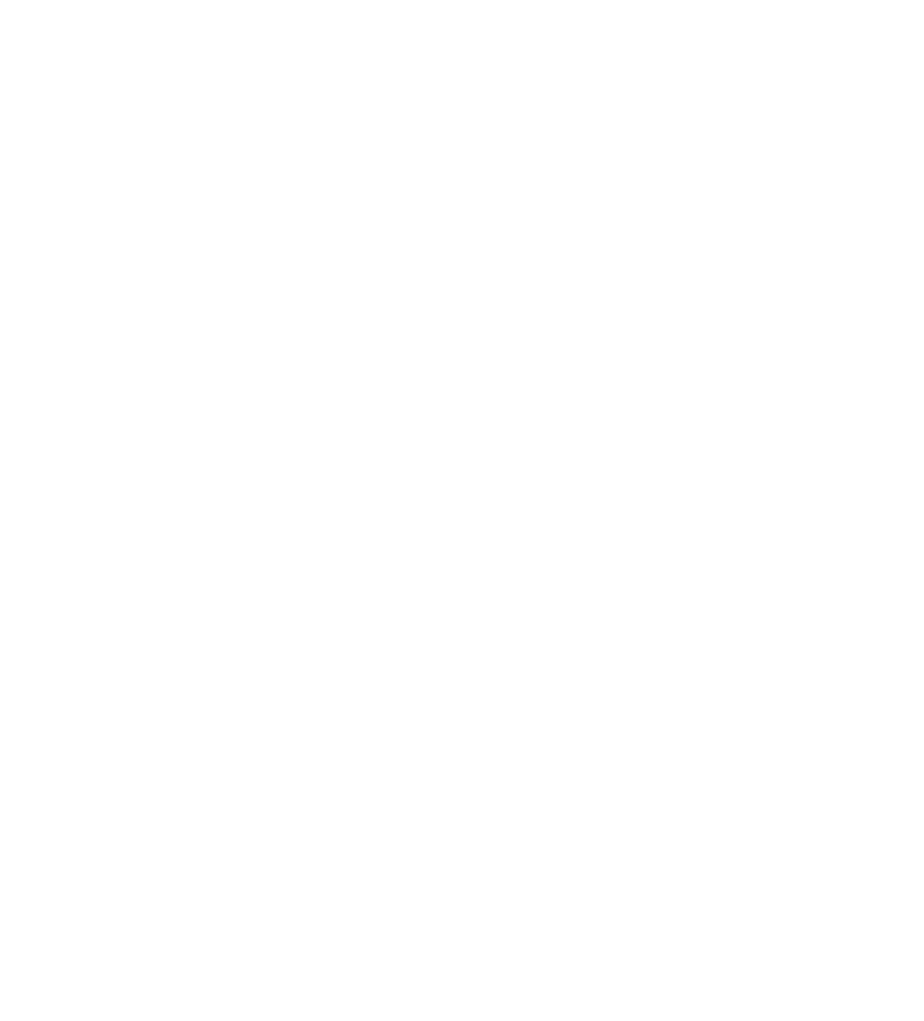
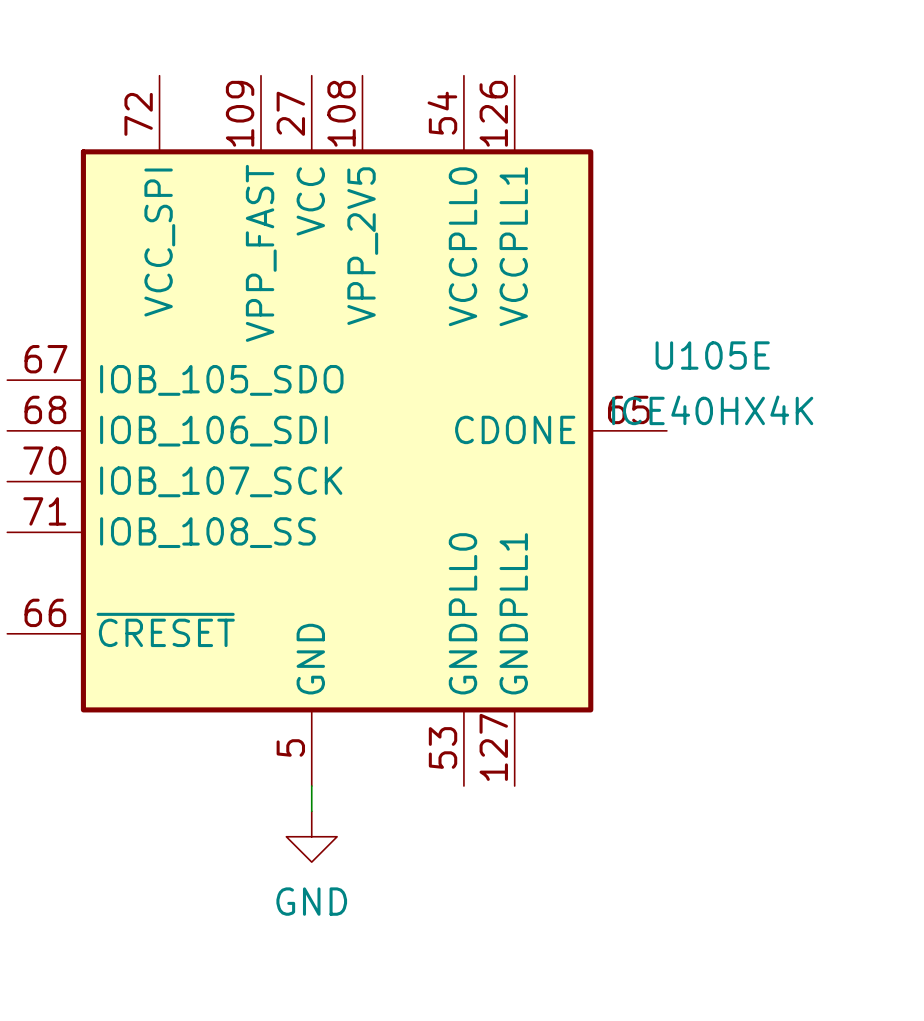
U105E: none -> ICE40HX4K (337, 430)
wire: none -> (311, 786) (311, 811)
power symbol: none -> GND (311, 836)

